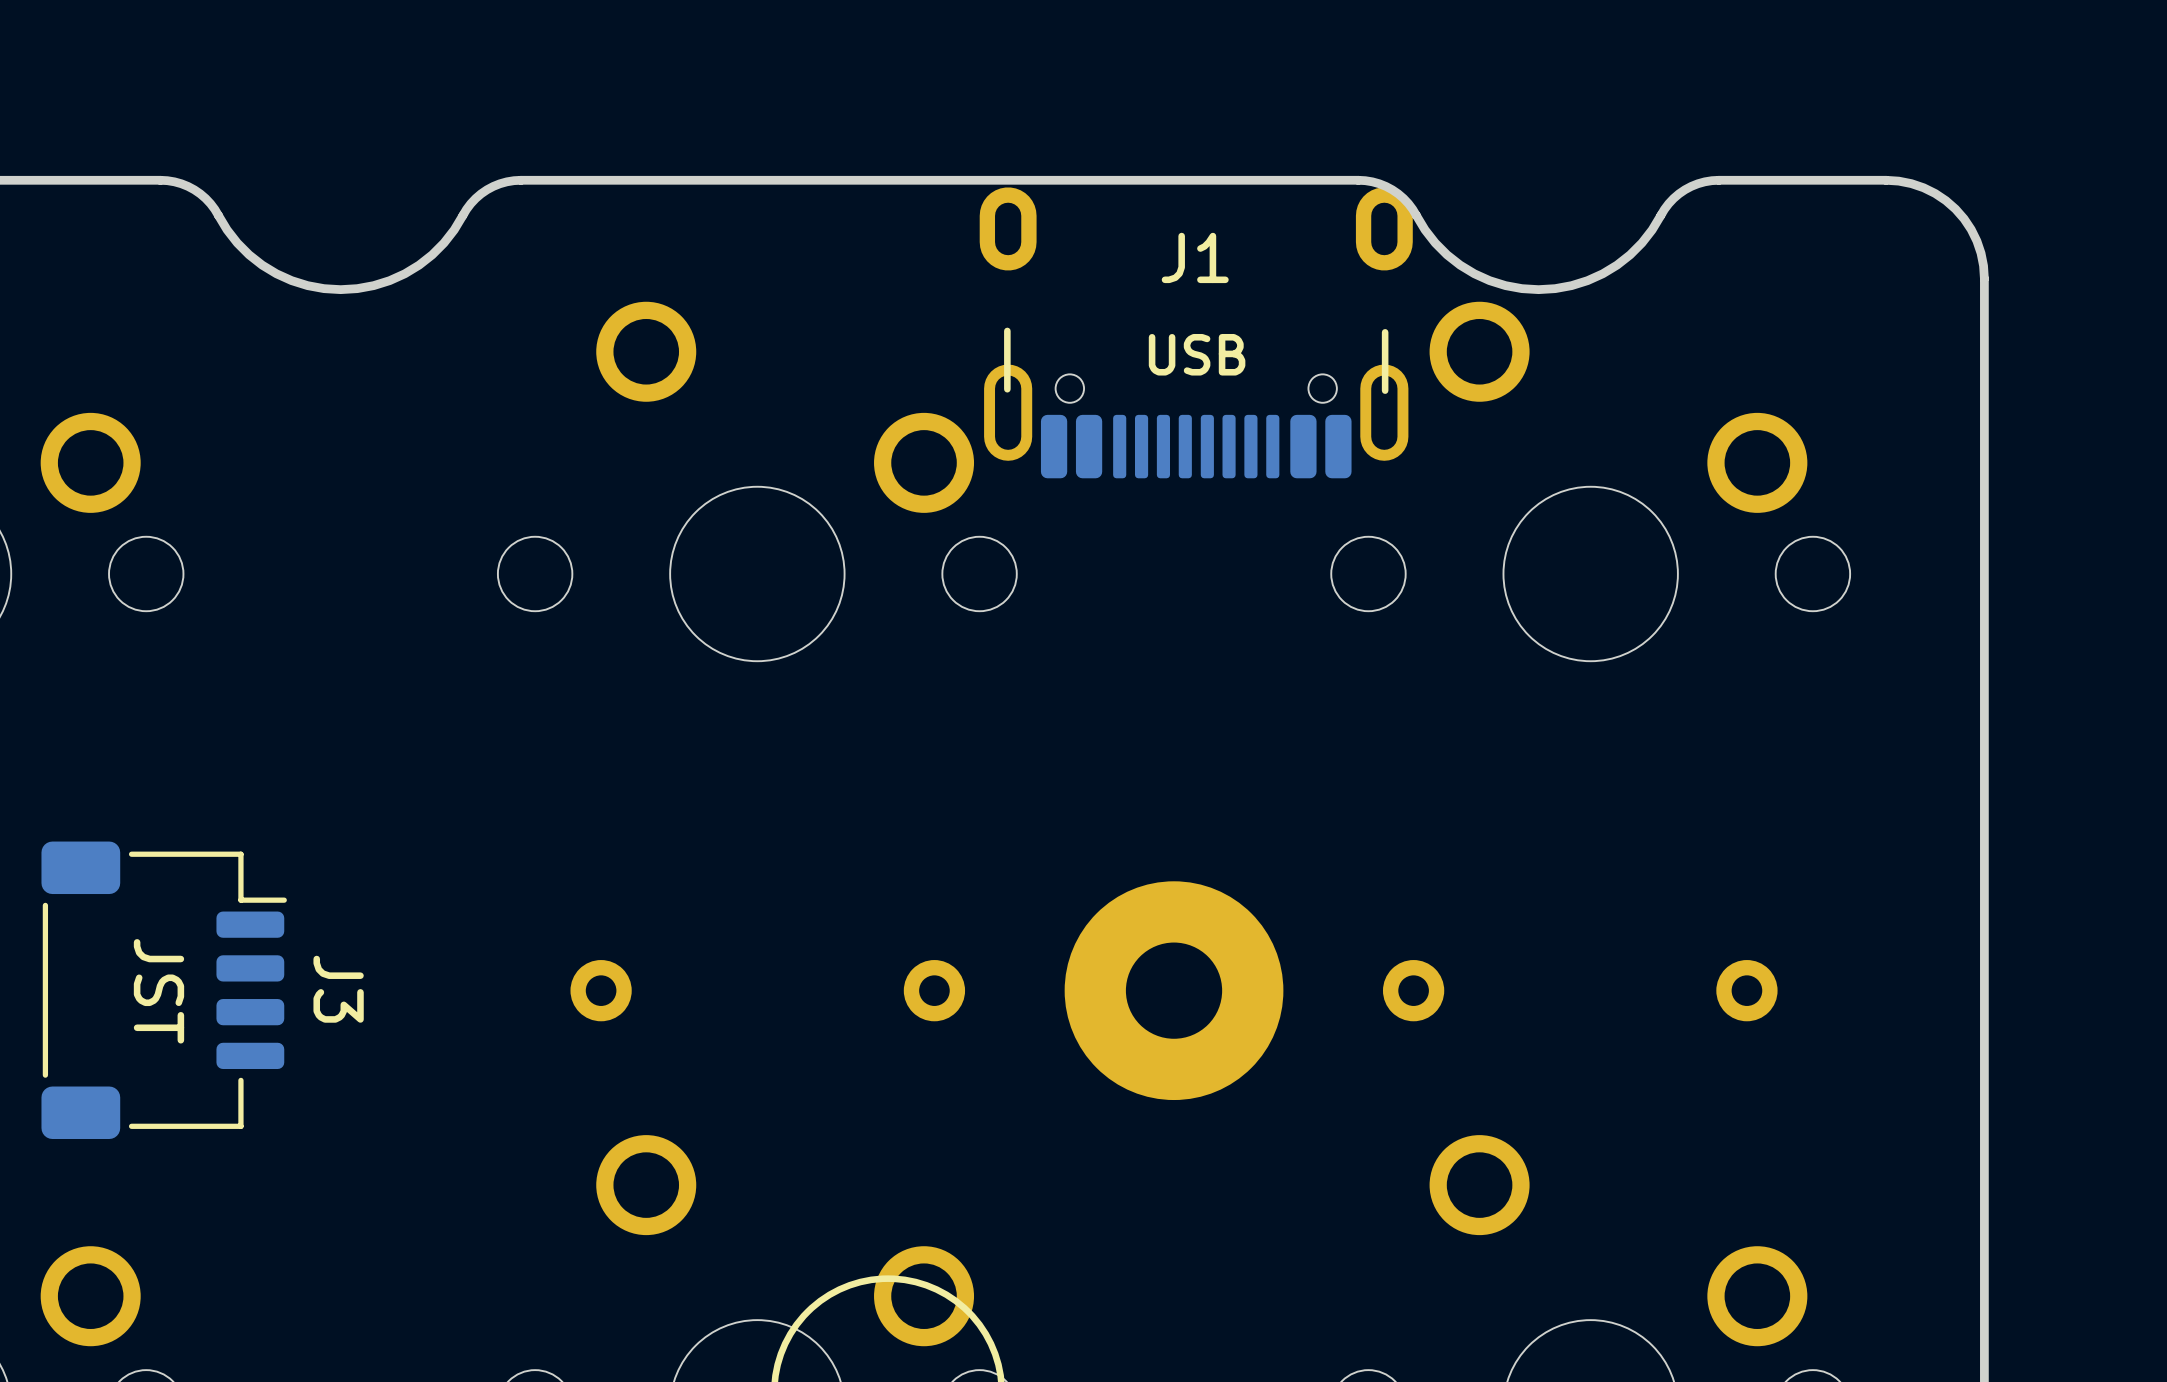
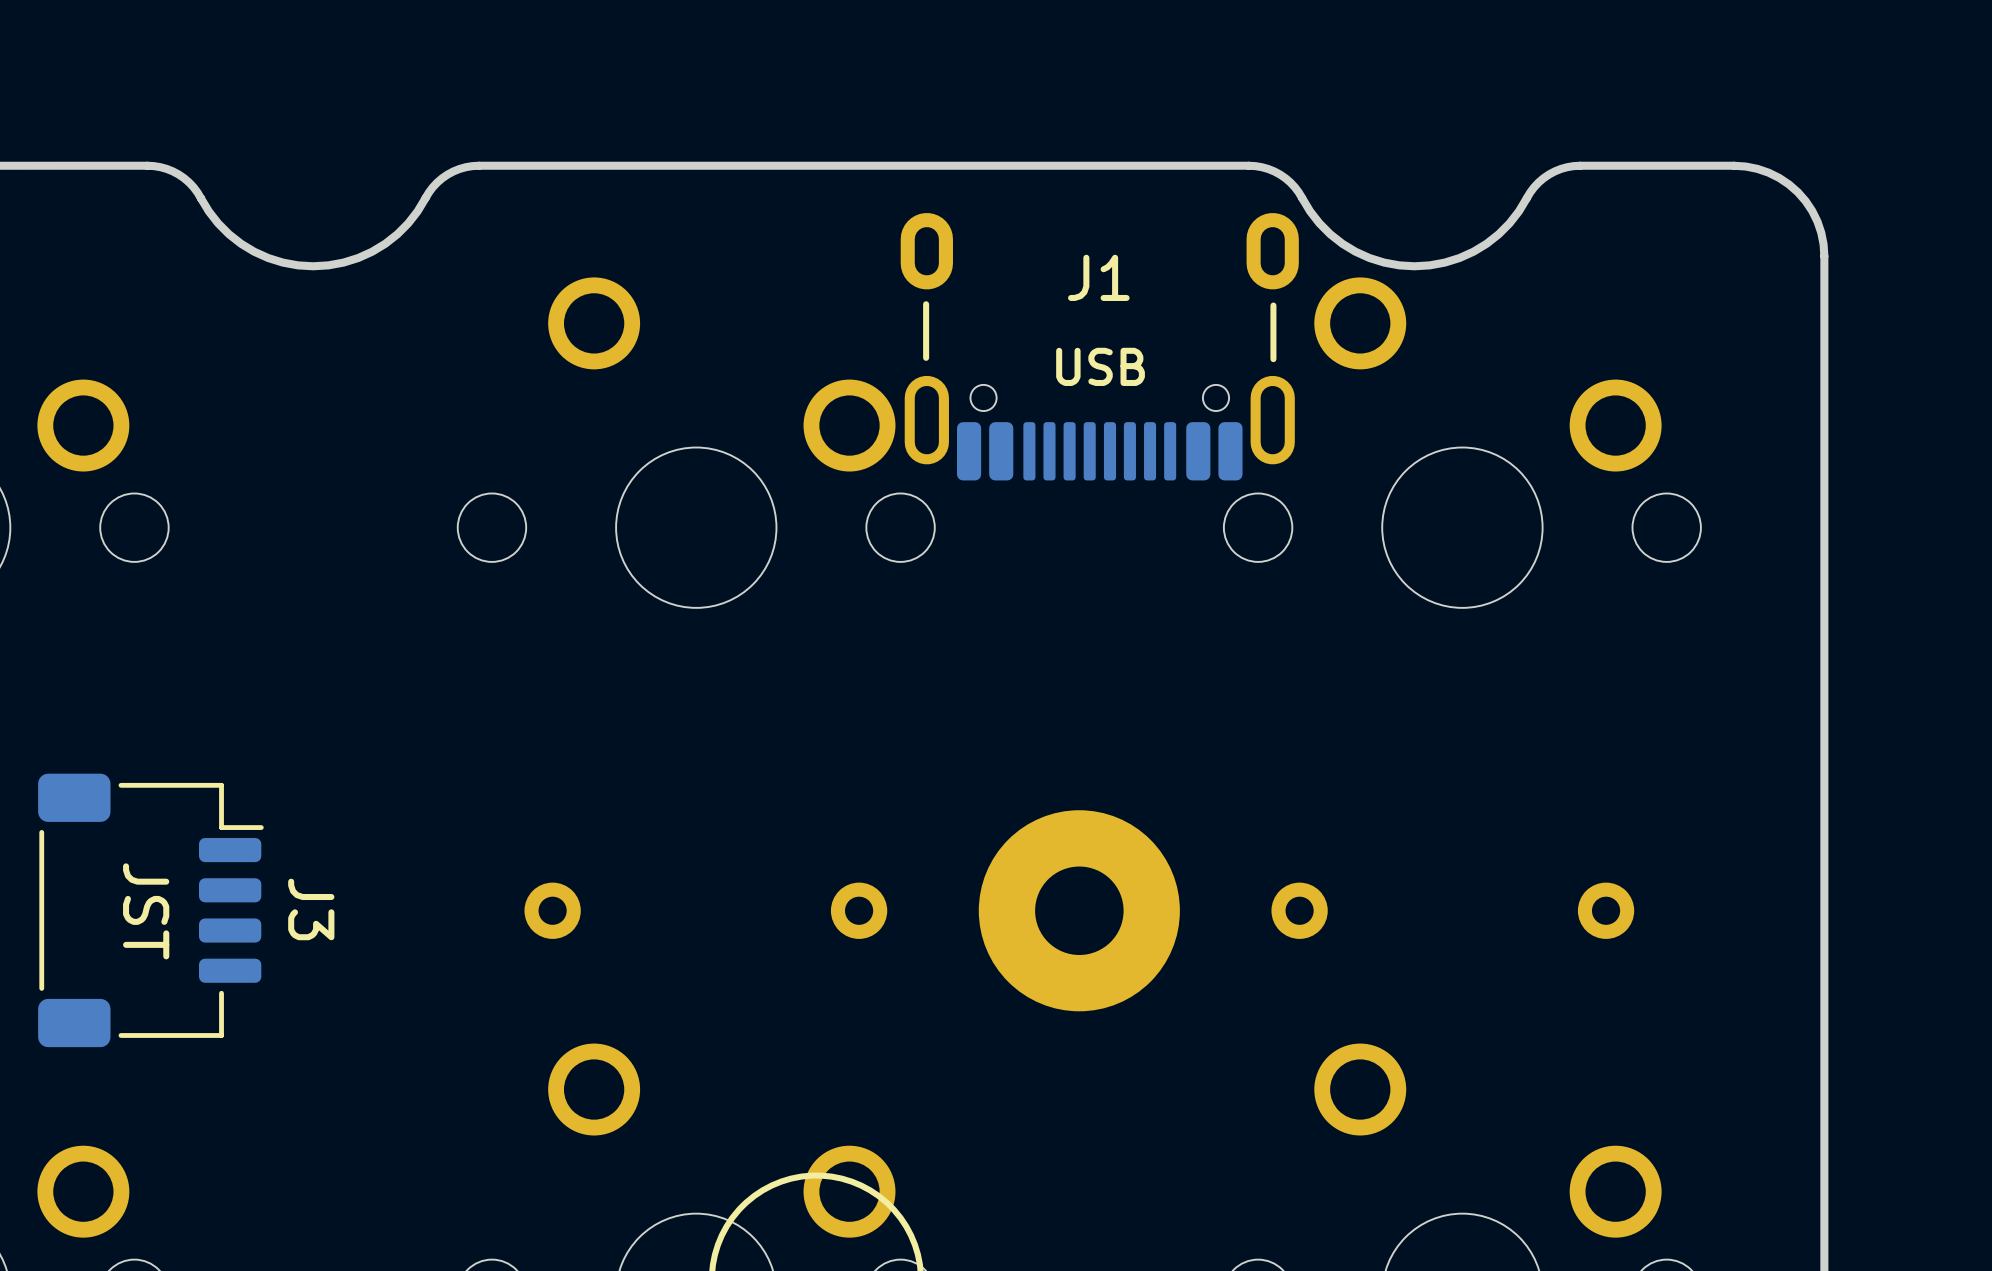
J1 position: (1196, 332) -> (1099, 346)

